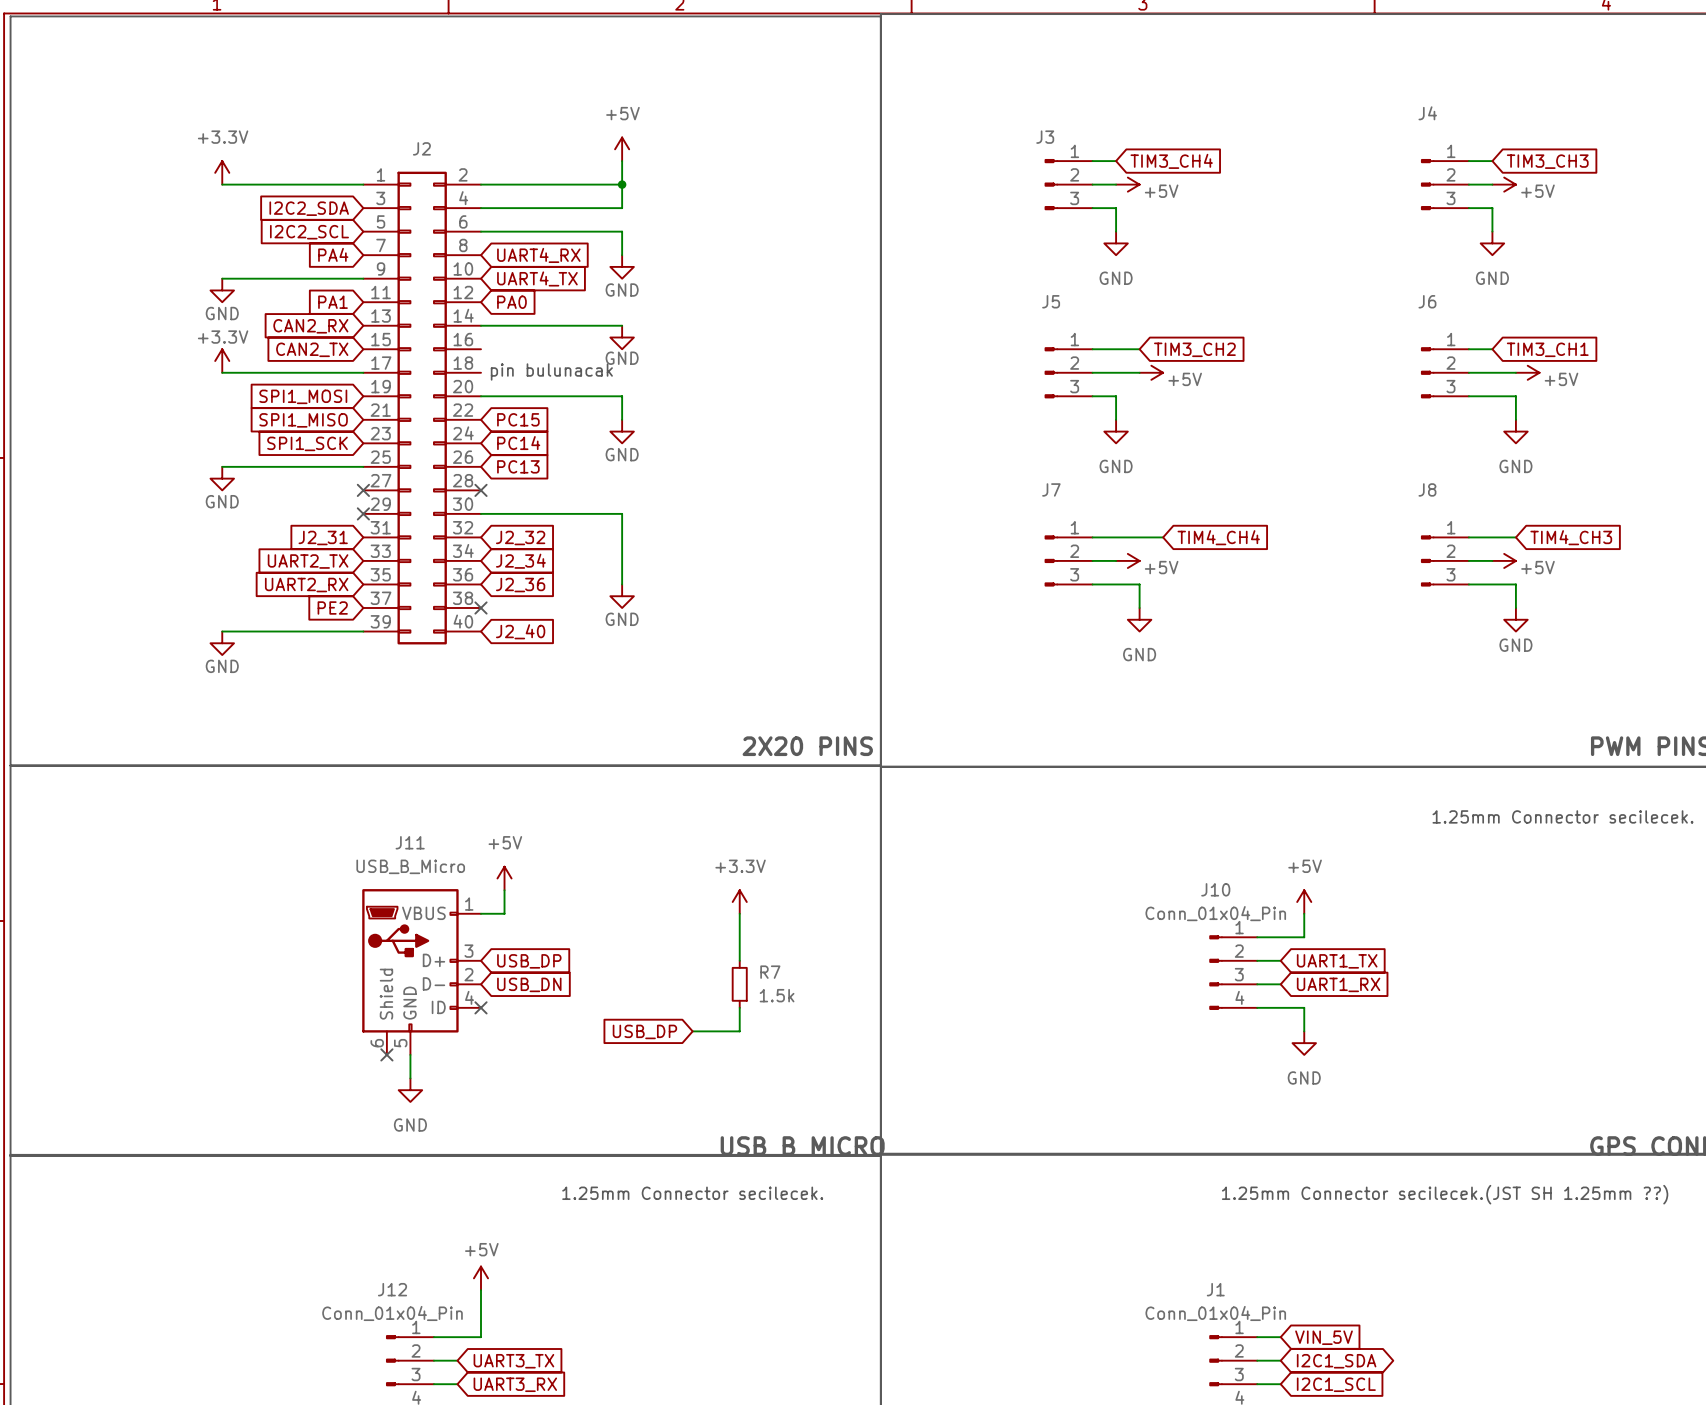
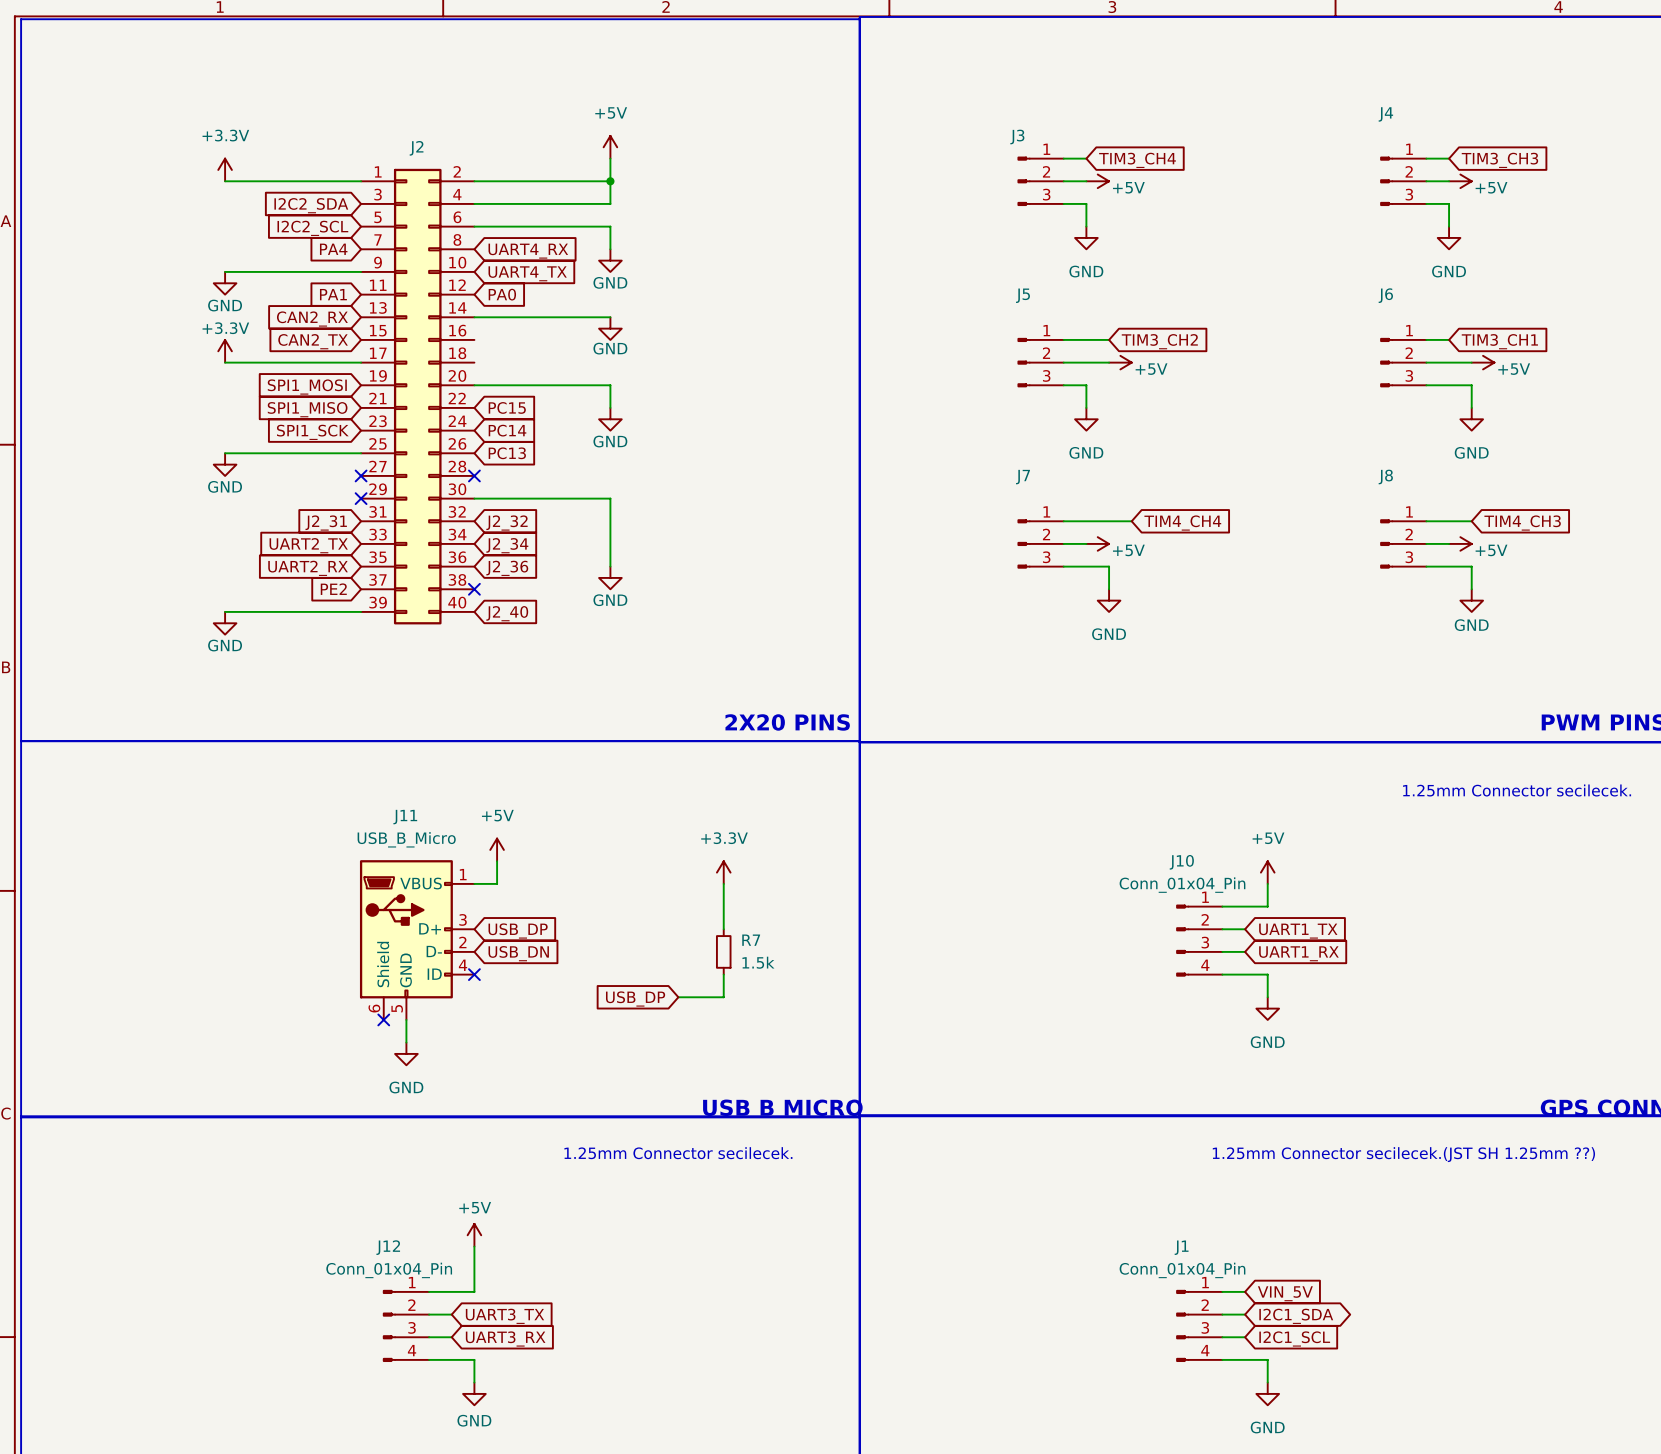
text: pin bulunacak (551, 371) -> none

